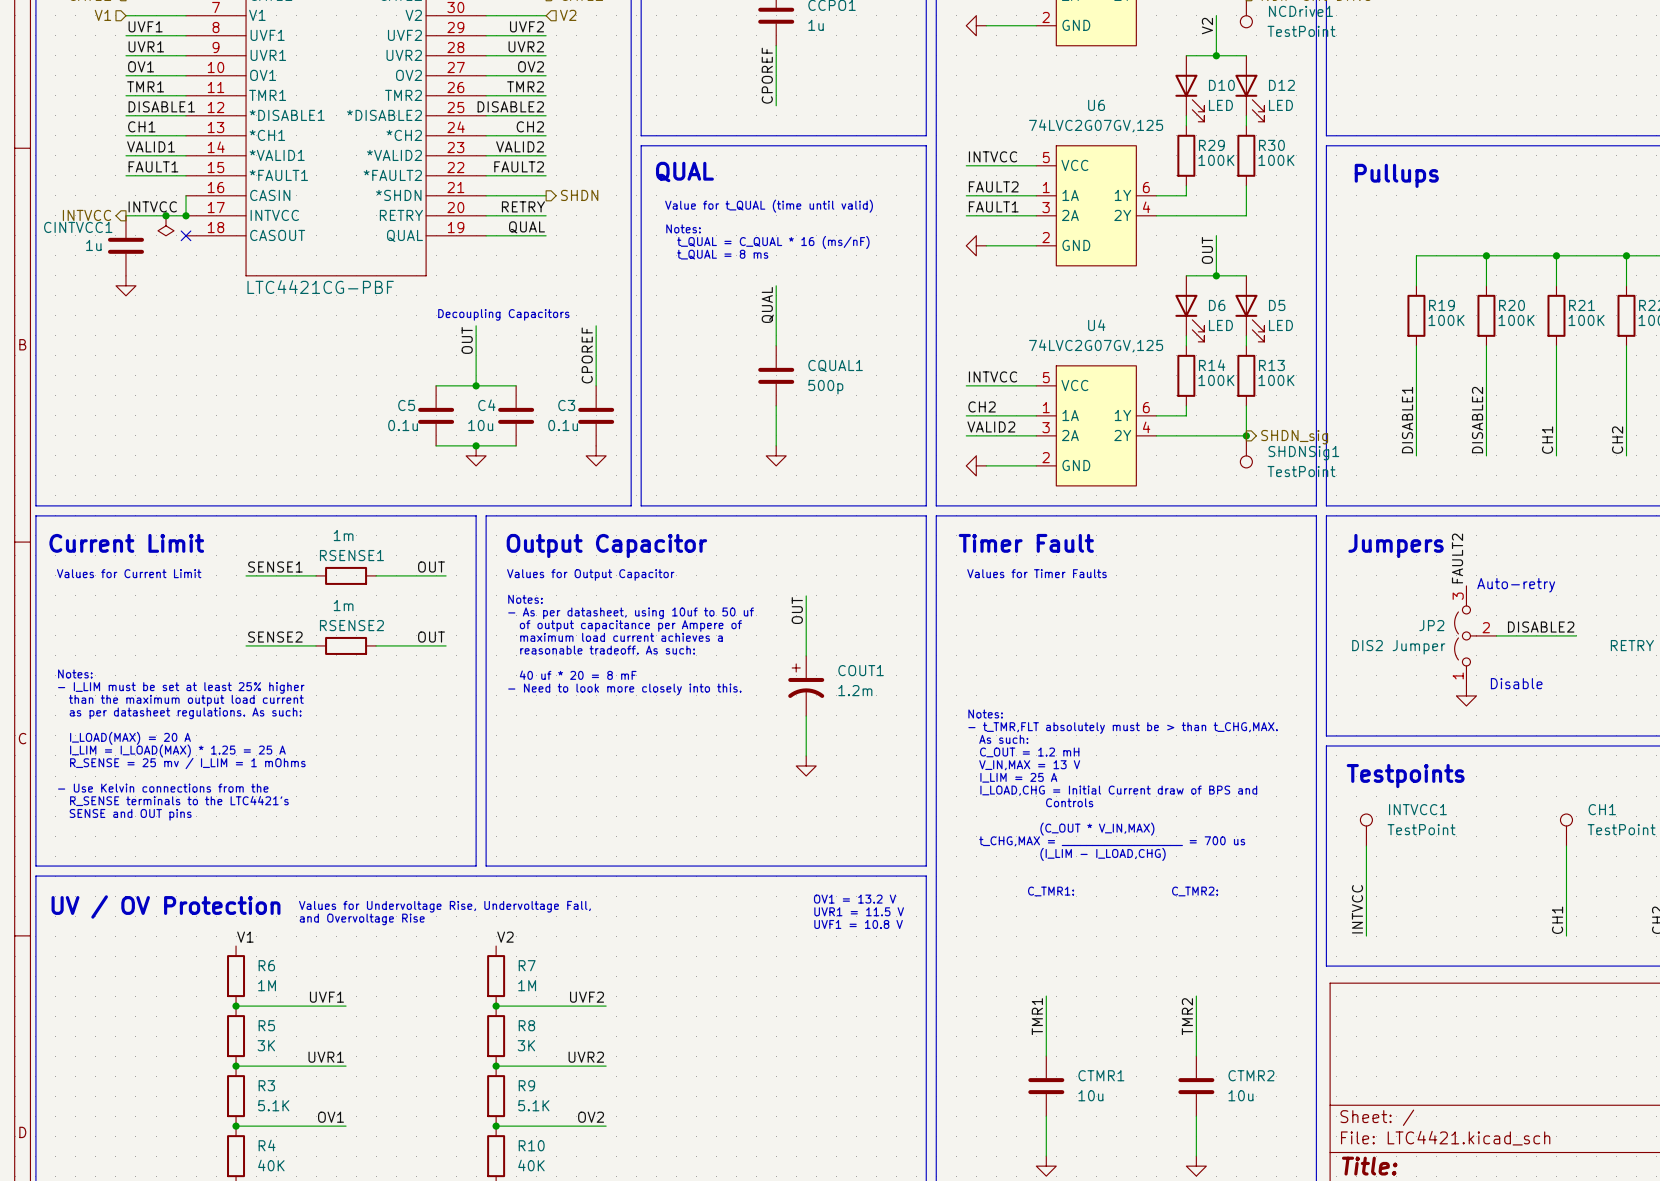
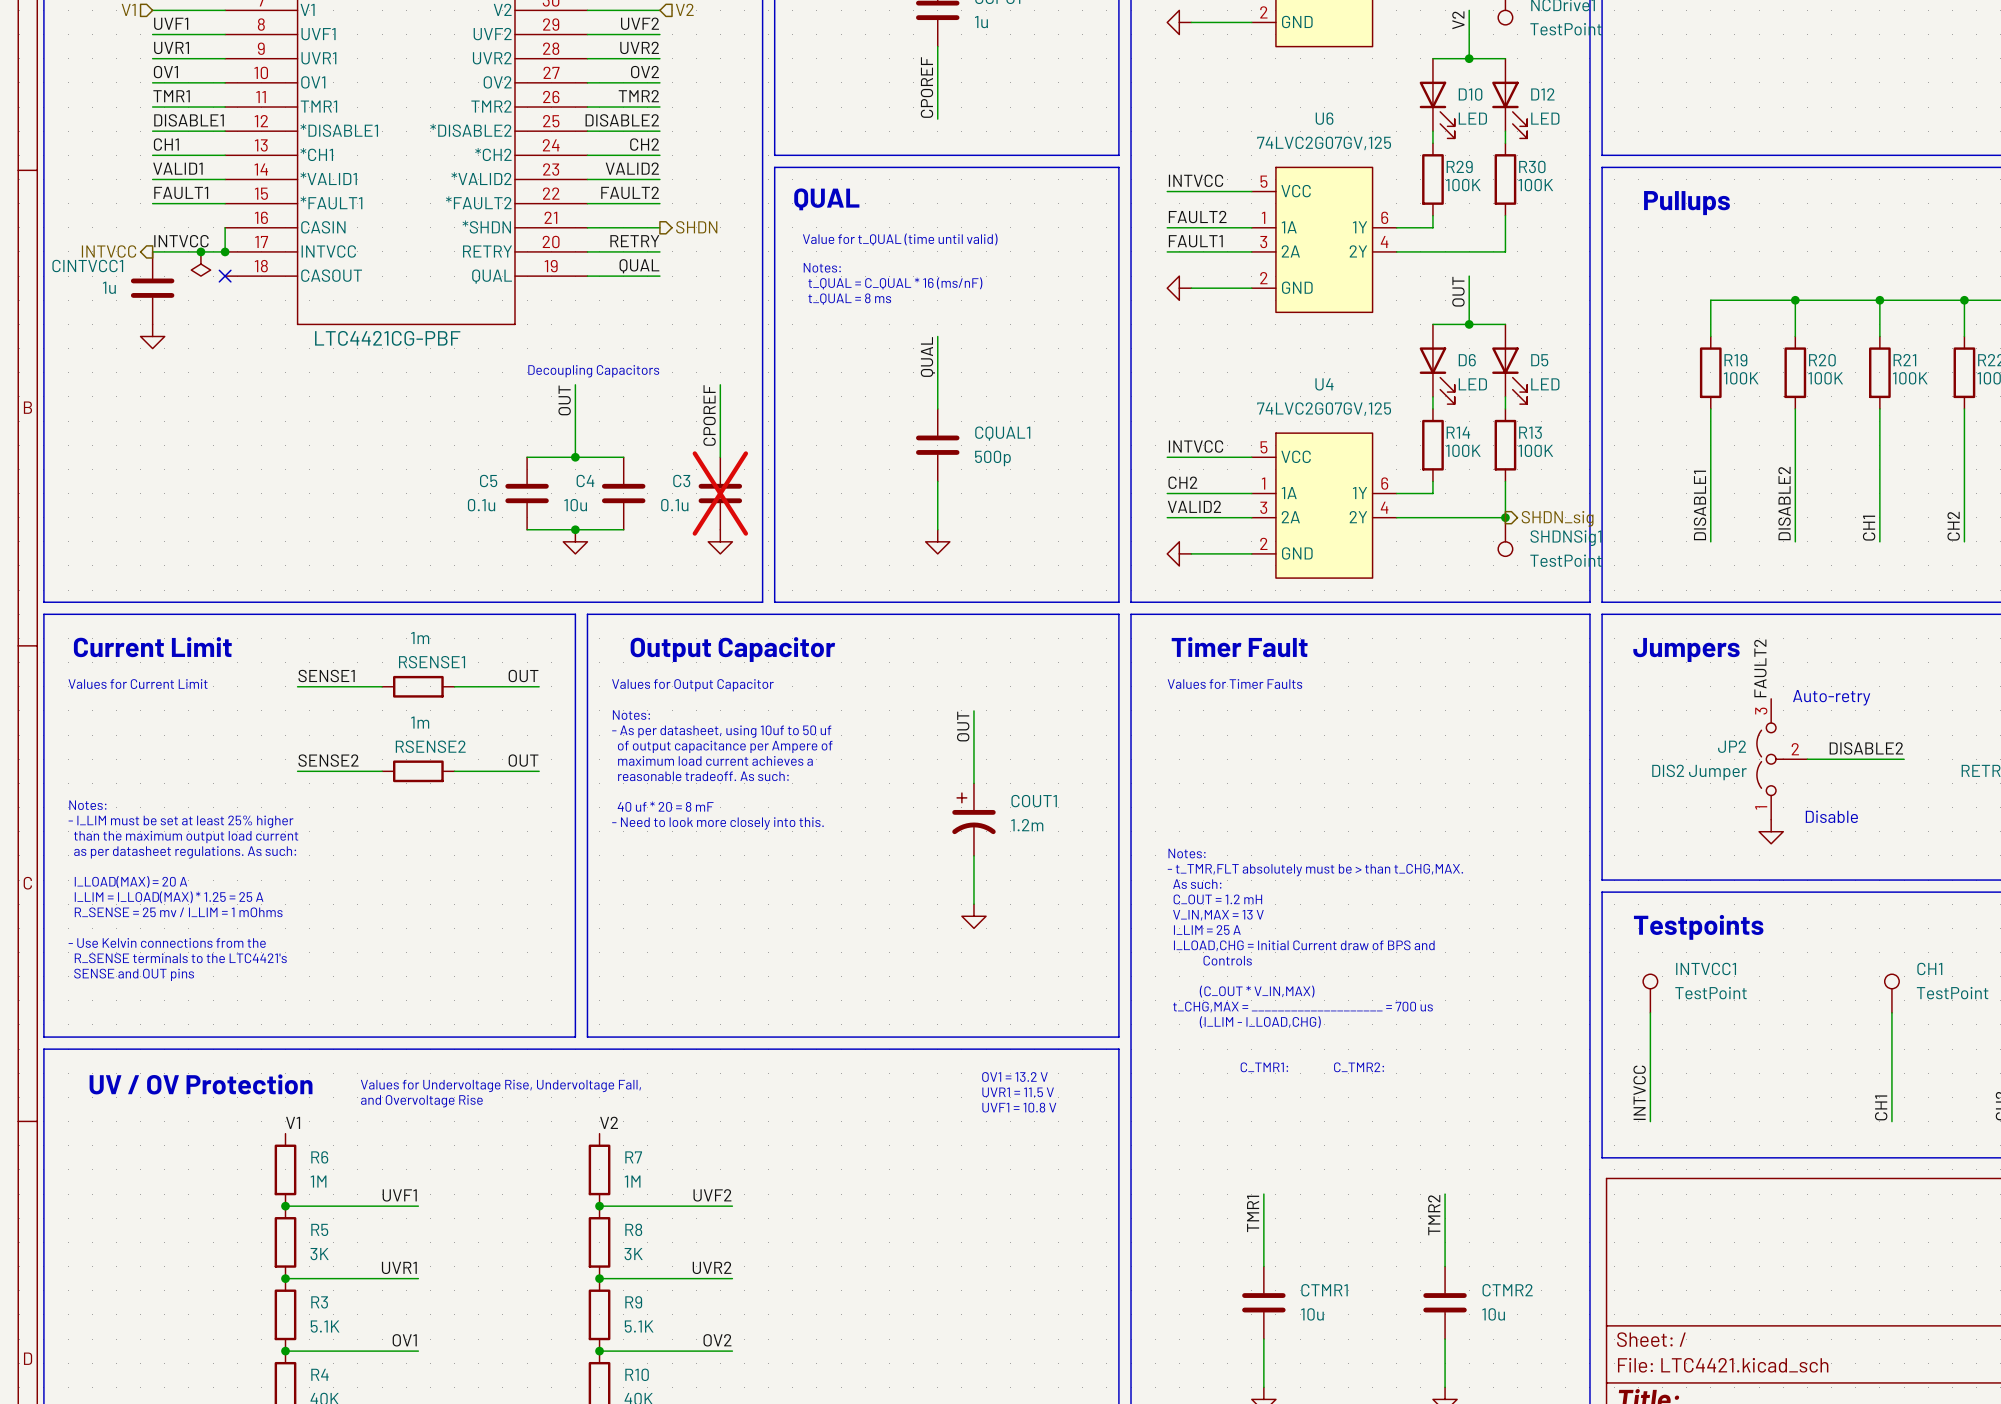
C3 do-not-place cross: none -> (720, 493)

